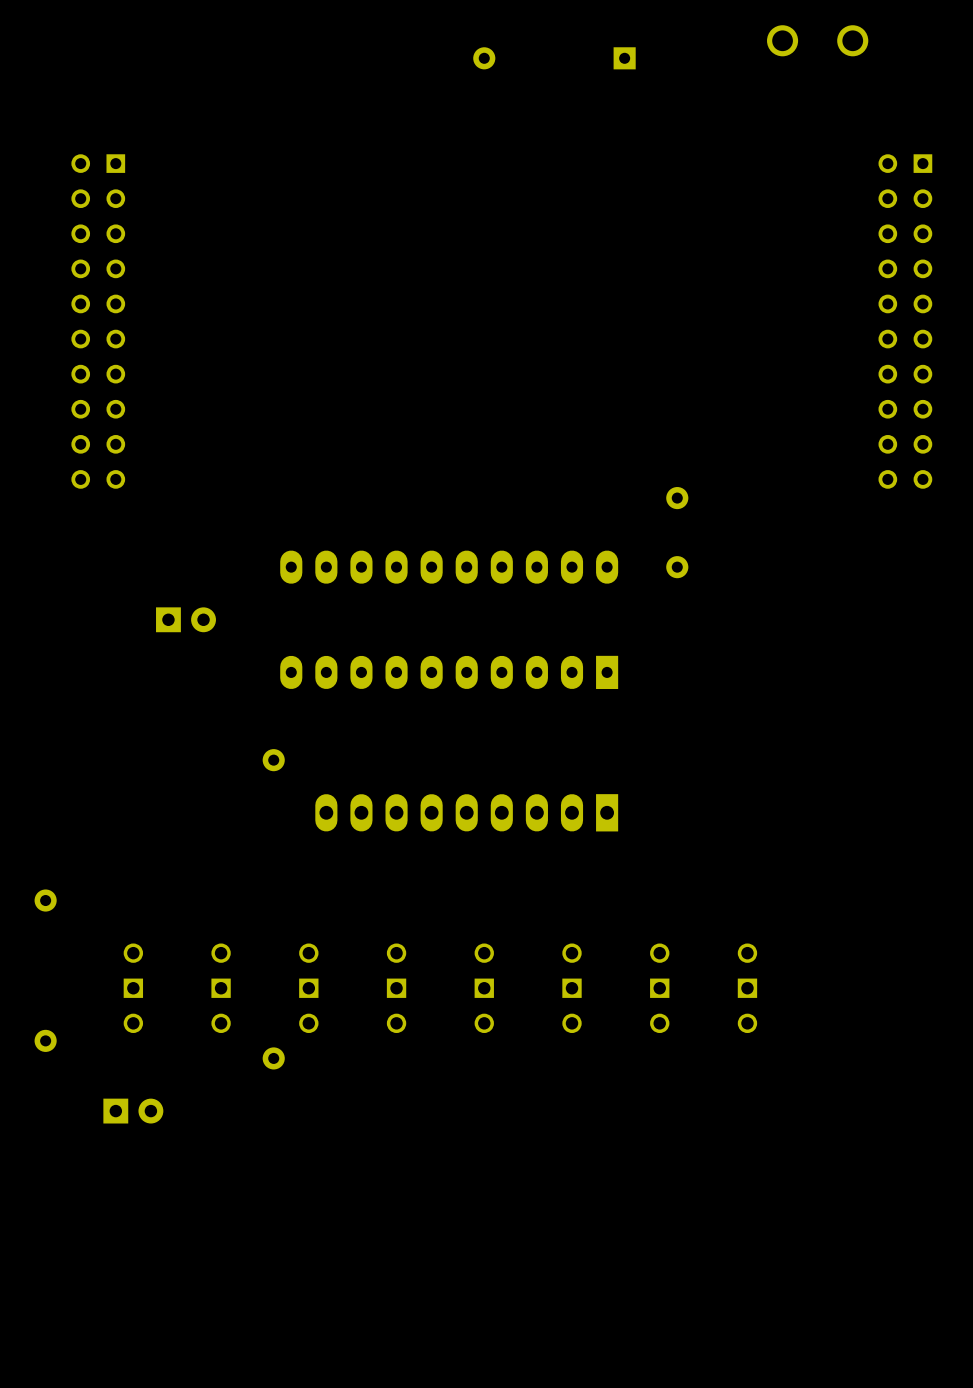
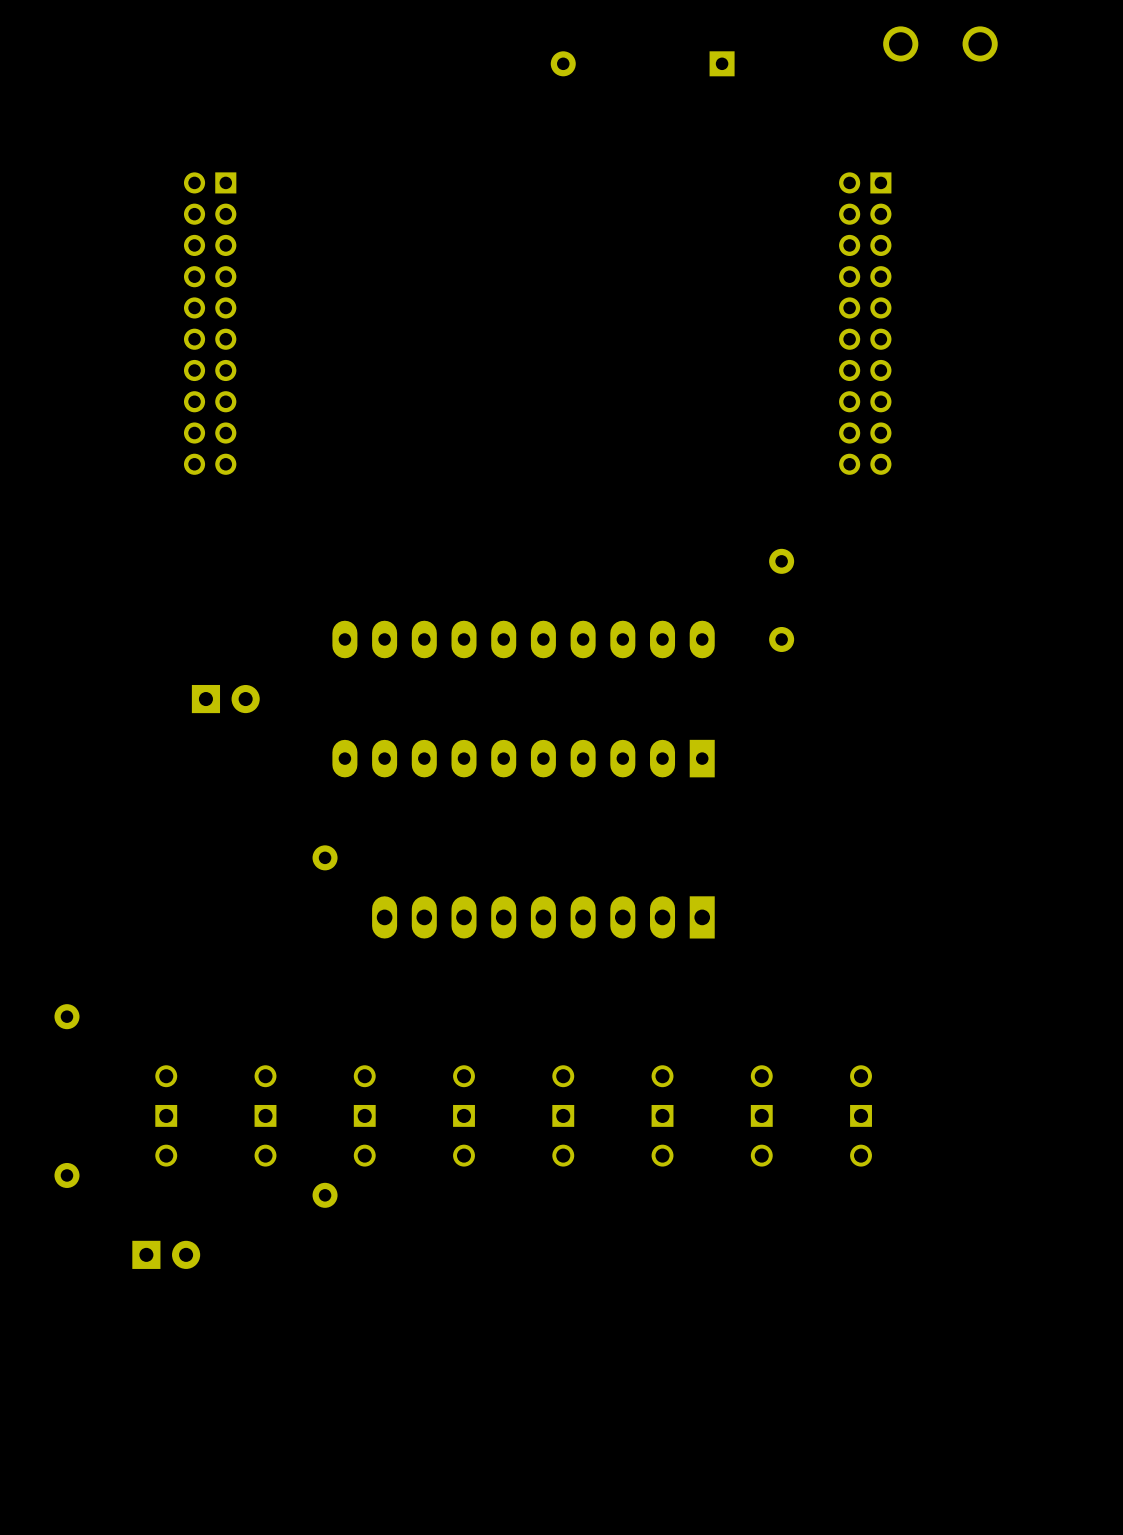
part: none -> (210, 323)
part: none -> (865, 323)
part: (98, 321) -> none
part: (905, 321) -> none

